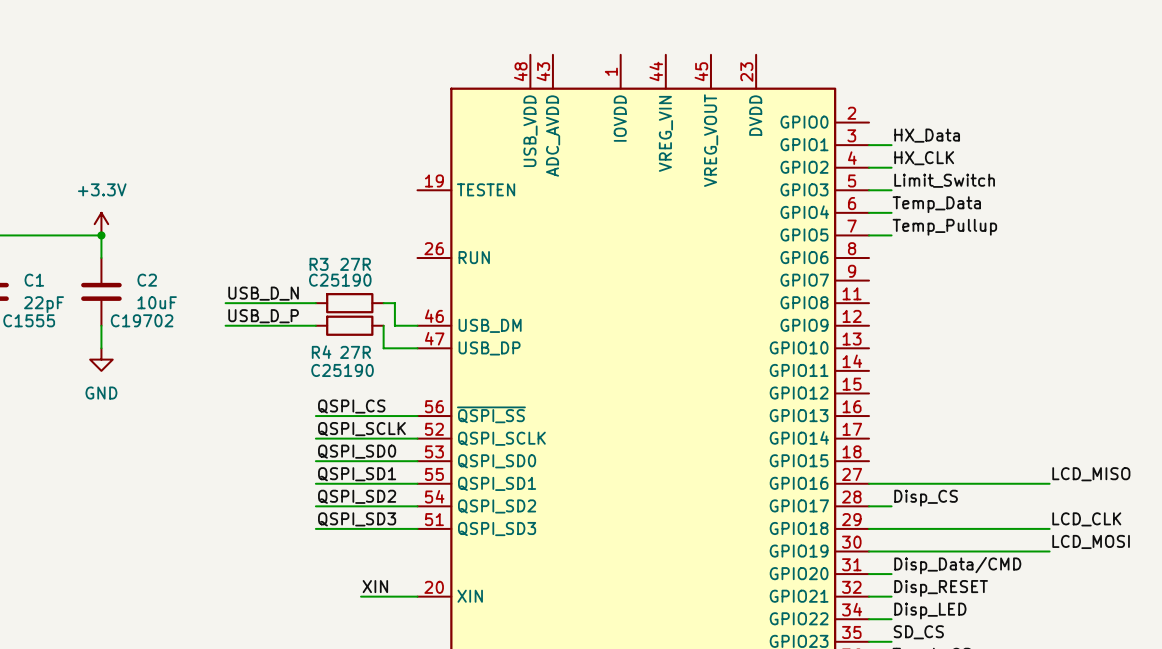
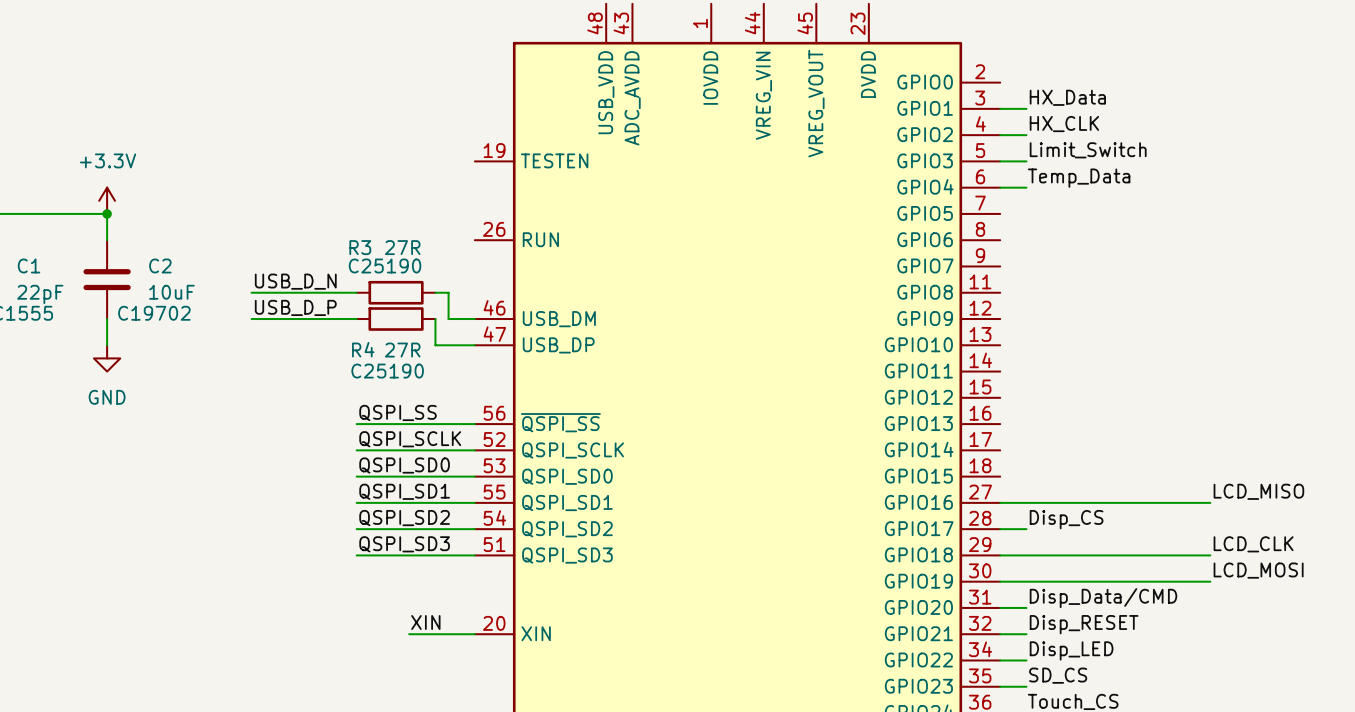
label: Temp_Pullup (944, 227) -> none
wire: (869, 235) (891, 235) -> none
label: QSPI_CS (351, 406) -> QSPI_SS (398, 412)

